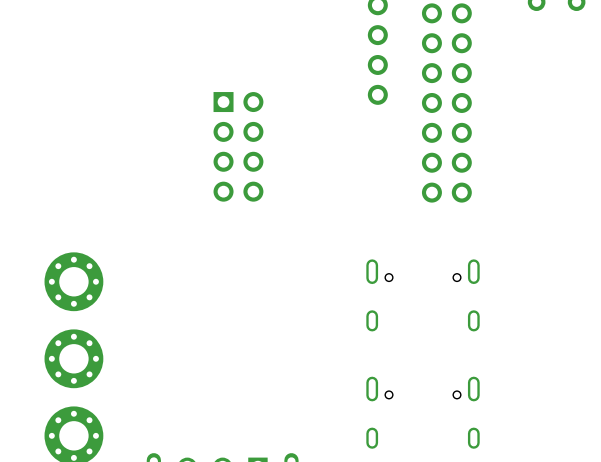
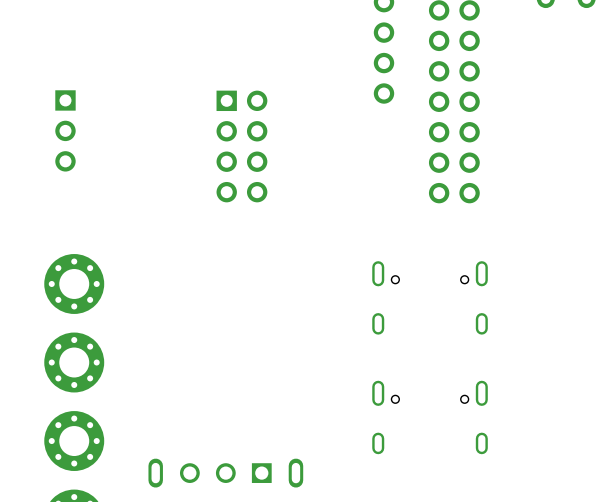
part: none -> (65, 130)

